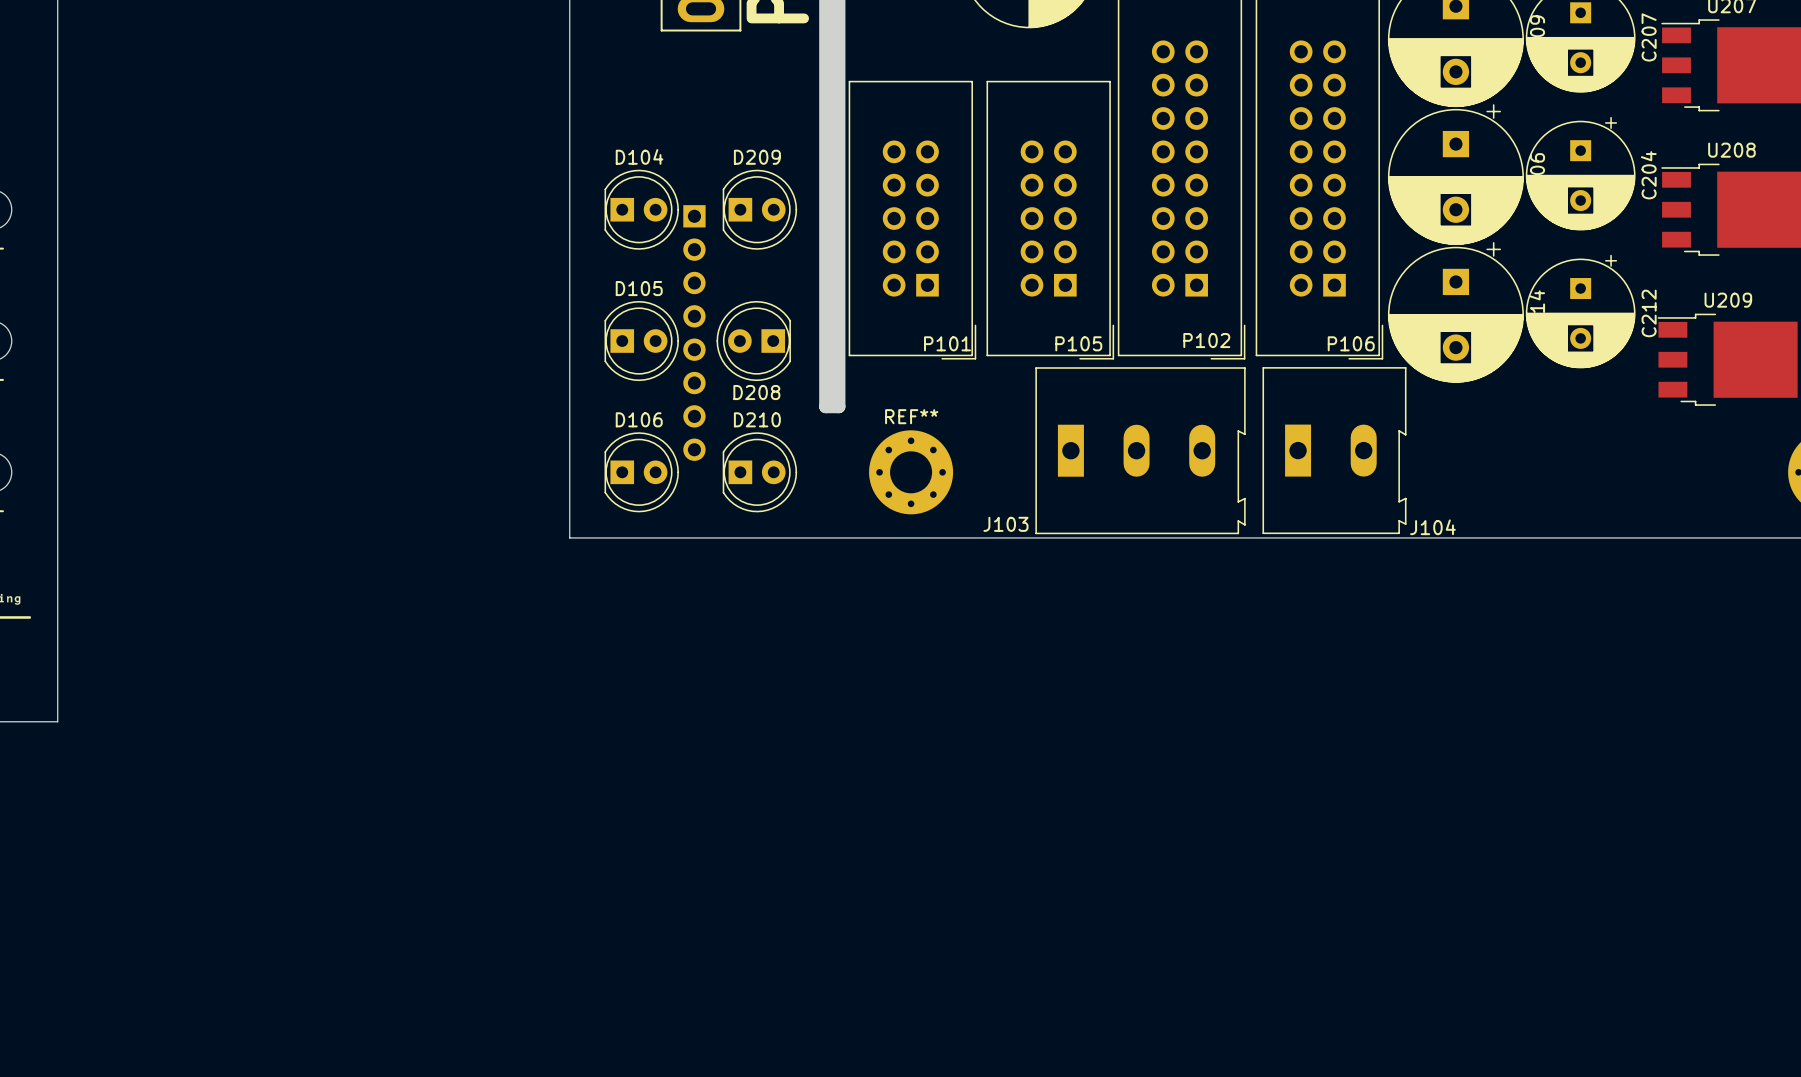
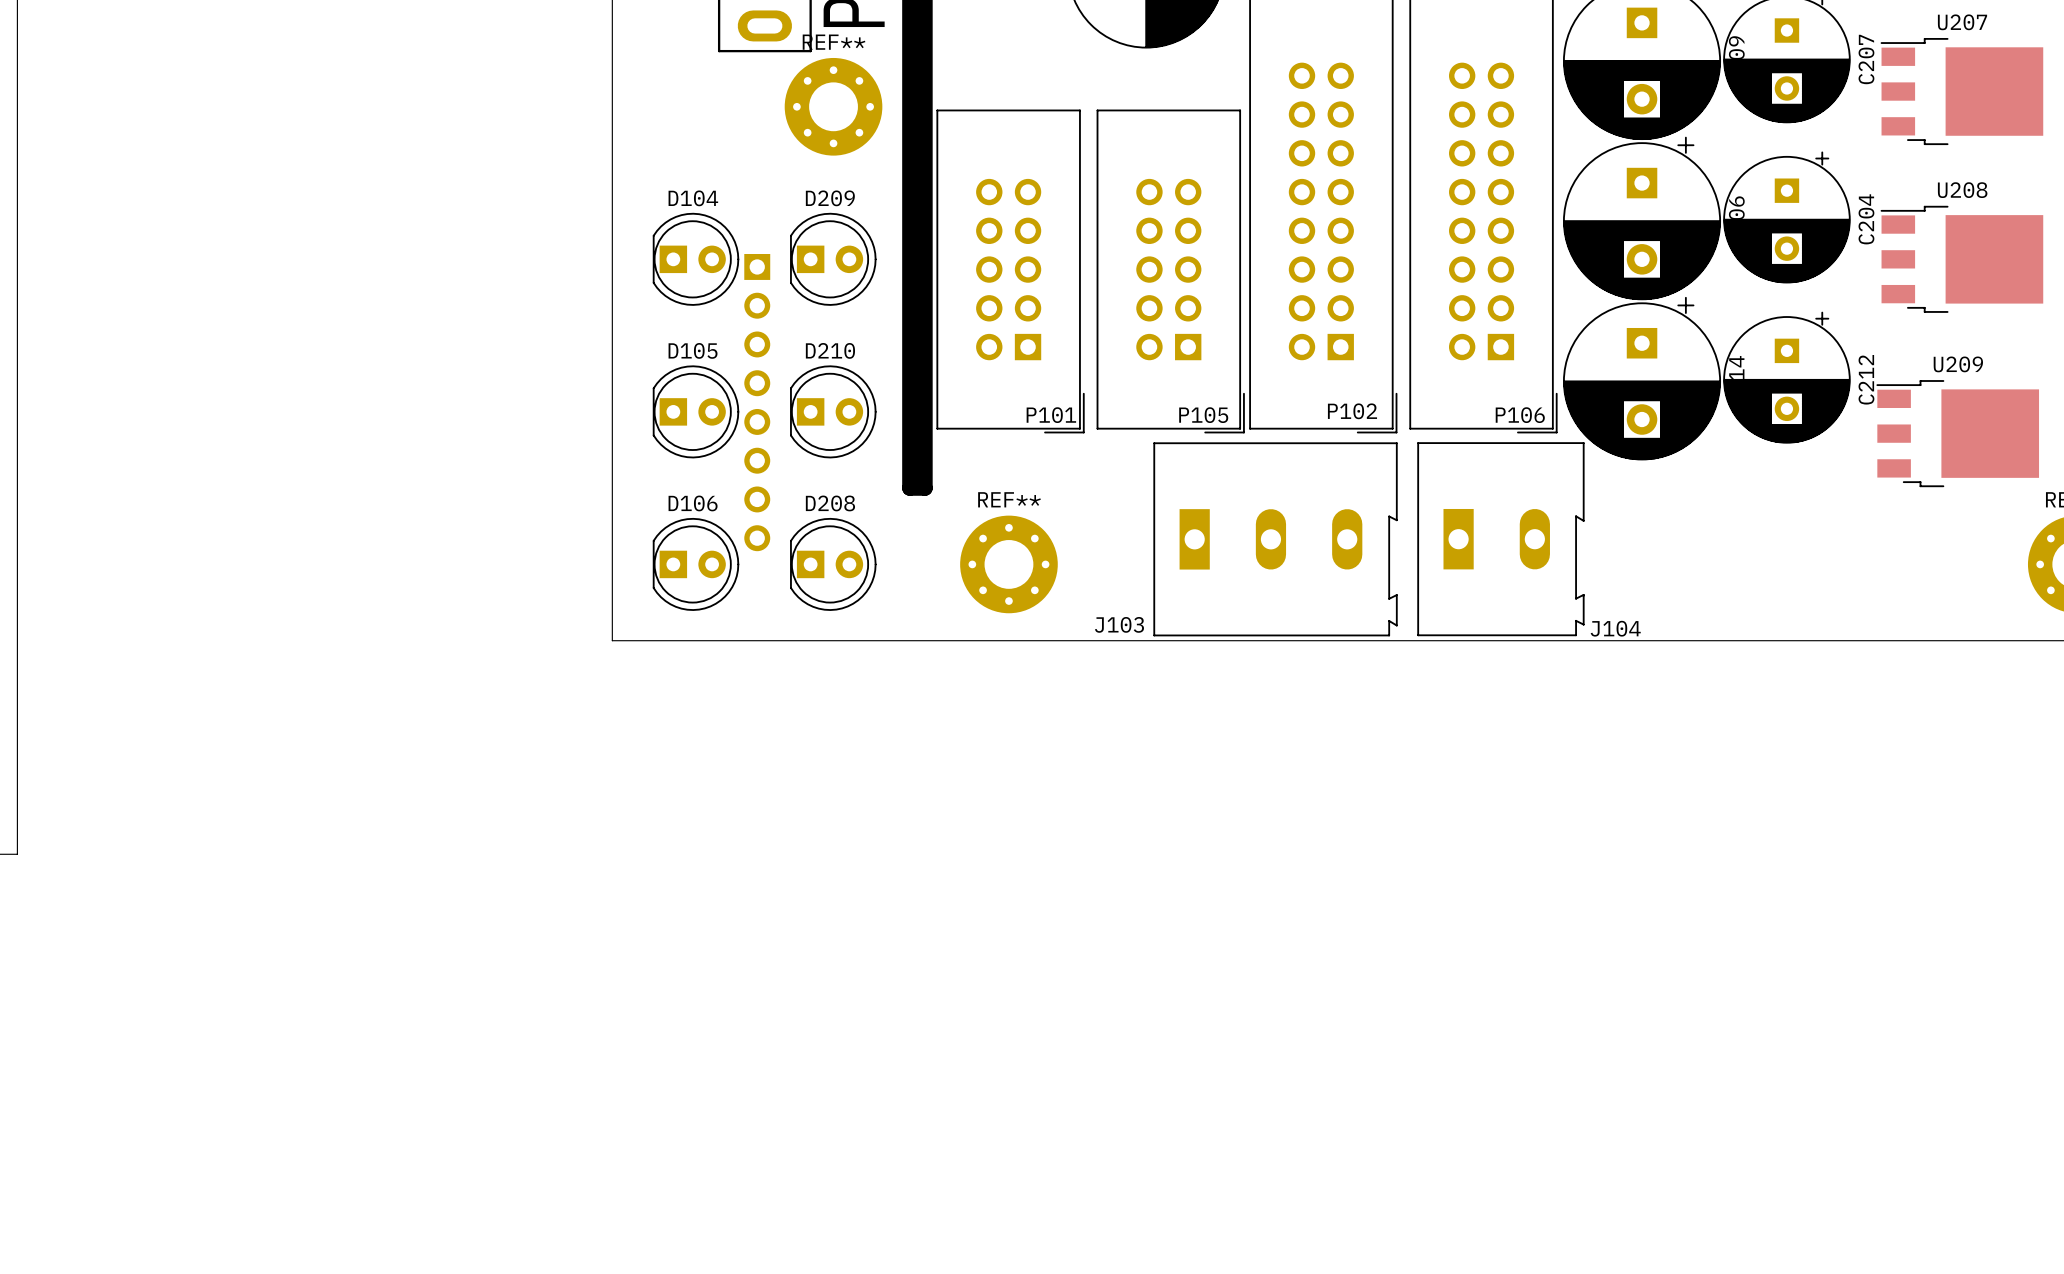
REF**: none -> (833, 106)
D208: (753, 341) -> none
D210: none -> (833, 411)
D210 name: D210 (757, 419) -> D208 (830, 503)

